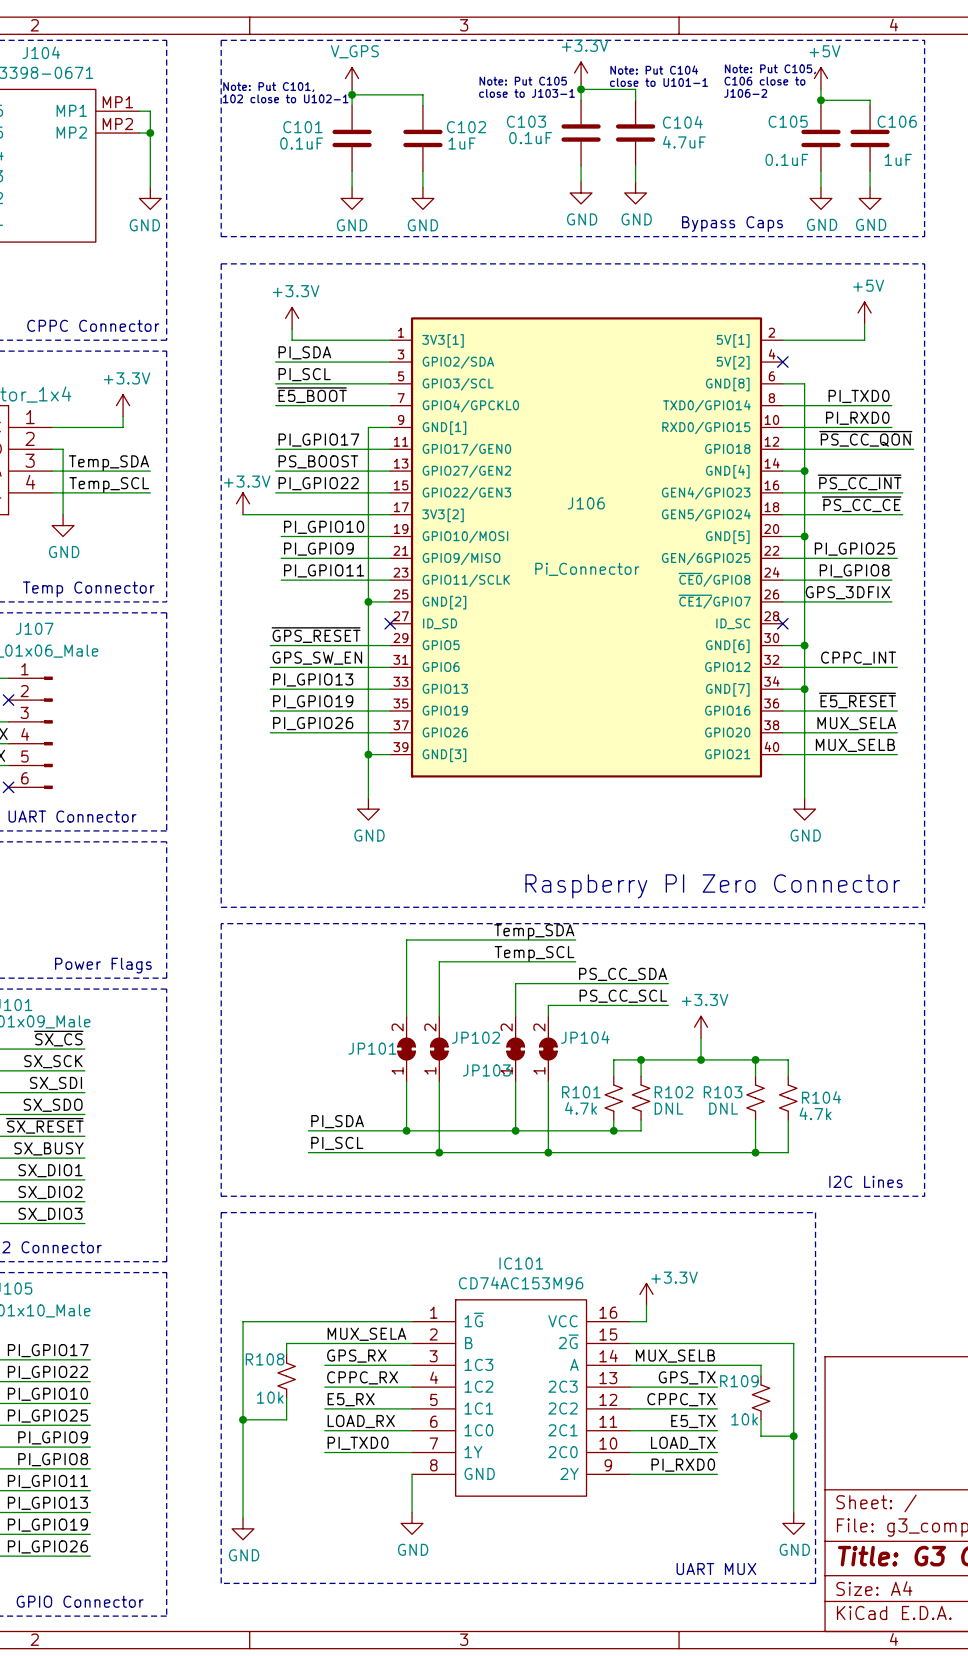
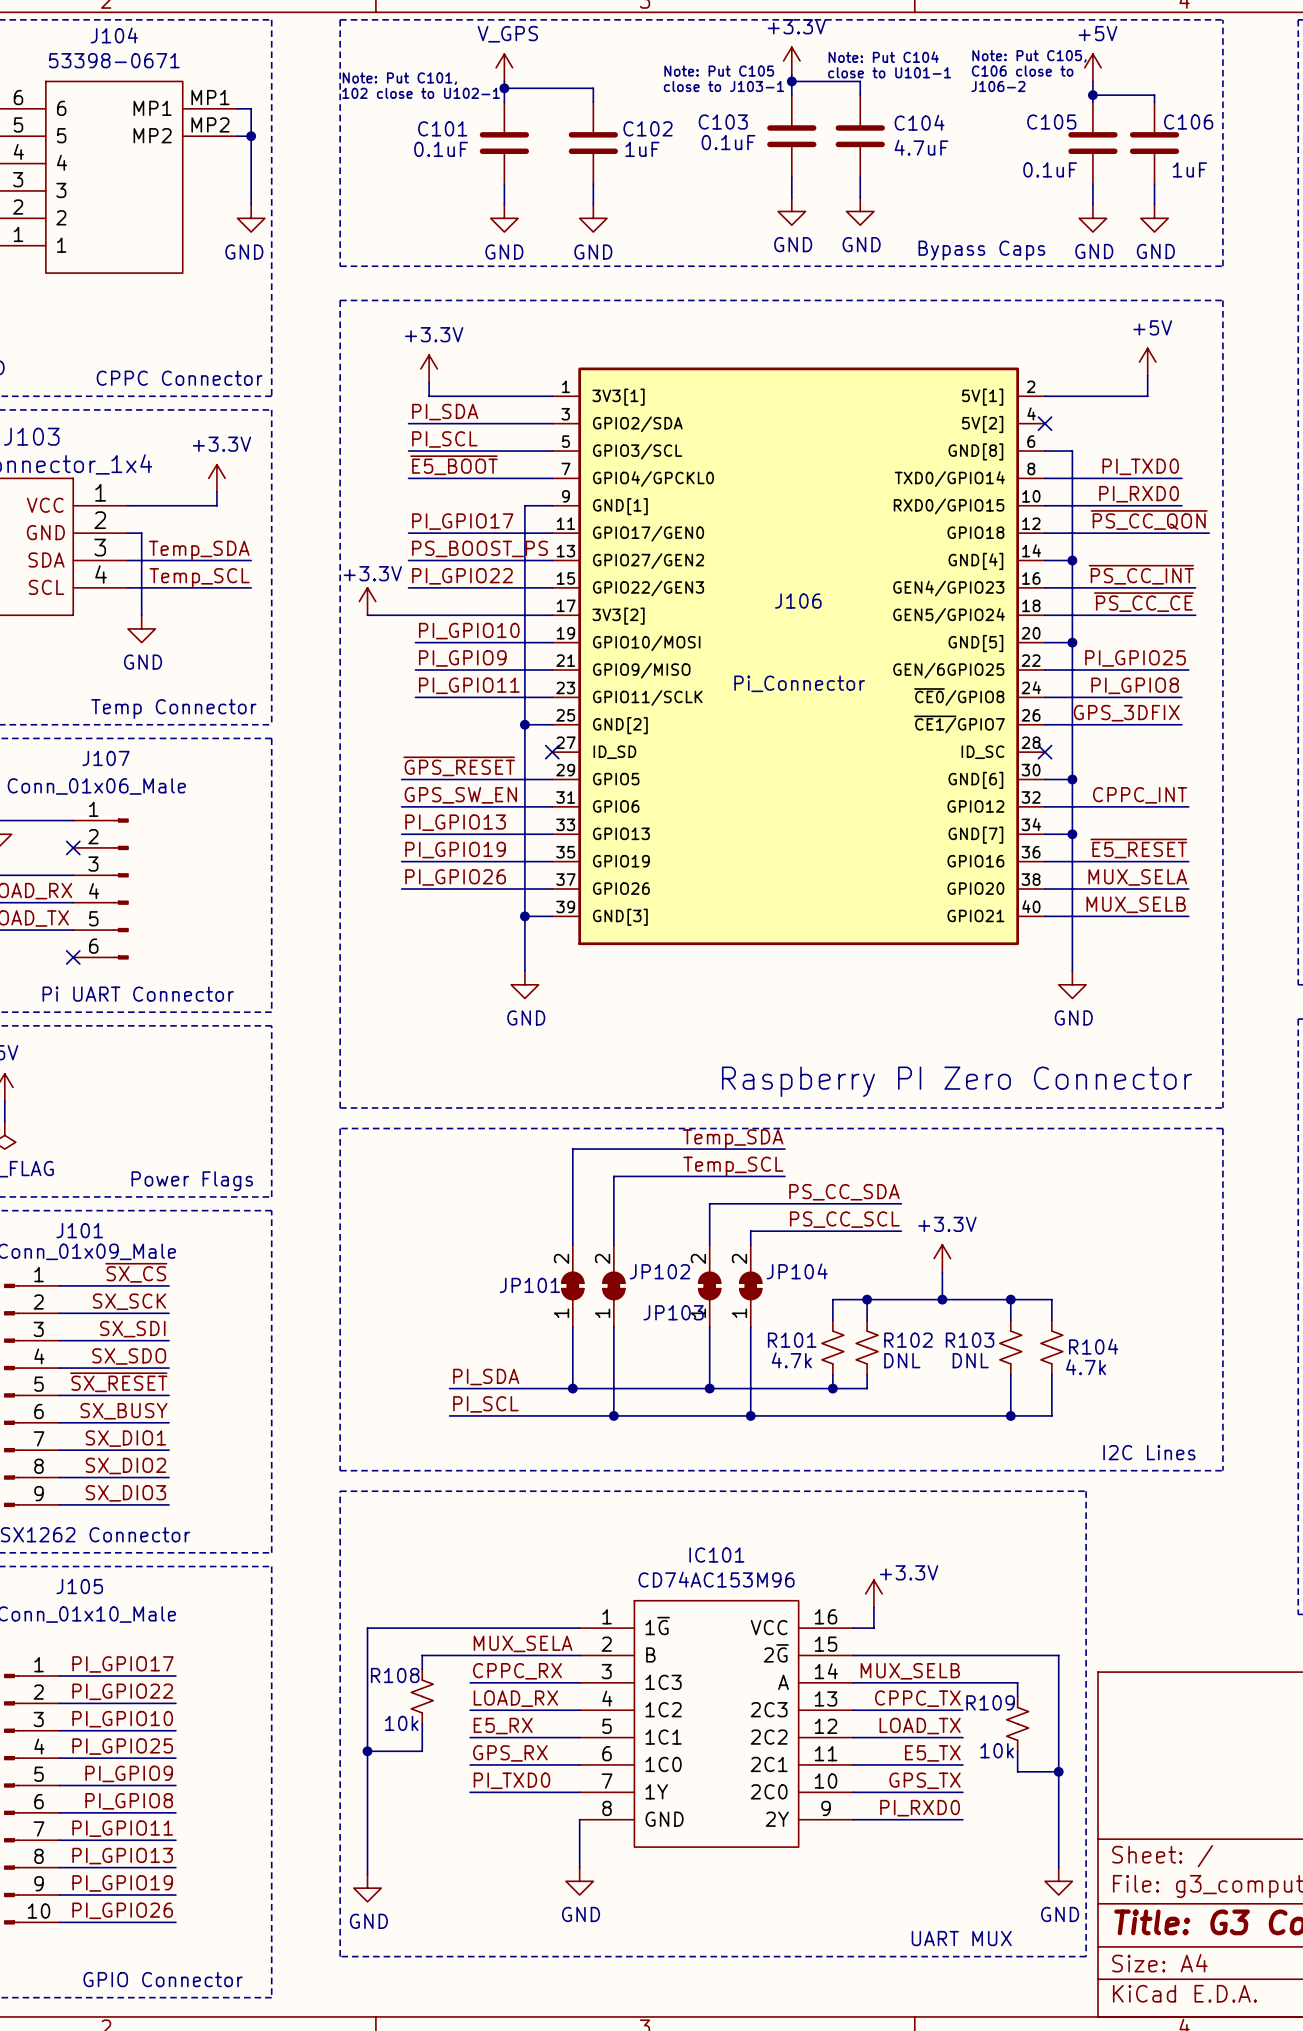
label: PS_BOOST (318, 461) -> PS_BOOST_PS (480, 548)
label: GPS_RX (356, 1356) -> CPPC_RX (517, 1671)
label: CPPC_RX (362, 1377) -> LOAD_RX (515, 1698)
label: GPS_TX (687, 1377) -> CPPC_TX (917, 1698)
label: CPPC_TX (681, 1399) -> LOAD_TX (920, 1726)
label: LOAD_RX (361, 1421) -> GPS_RX (510, 1753)
label: LOAD_TX (683, 1443) -> GPS_TX (924, 1780)

